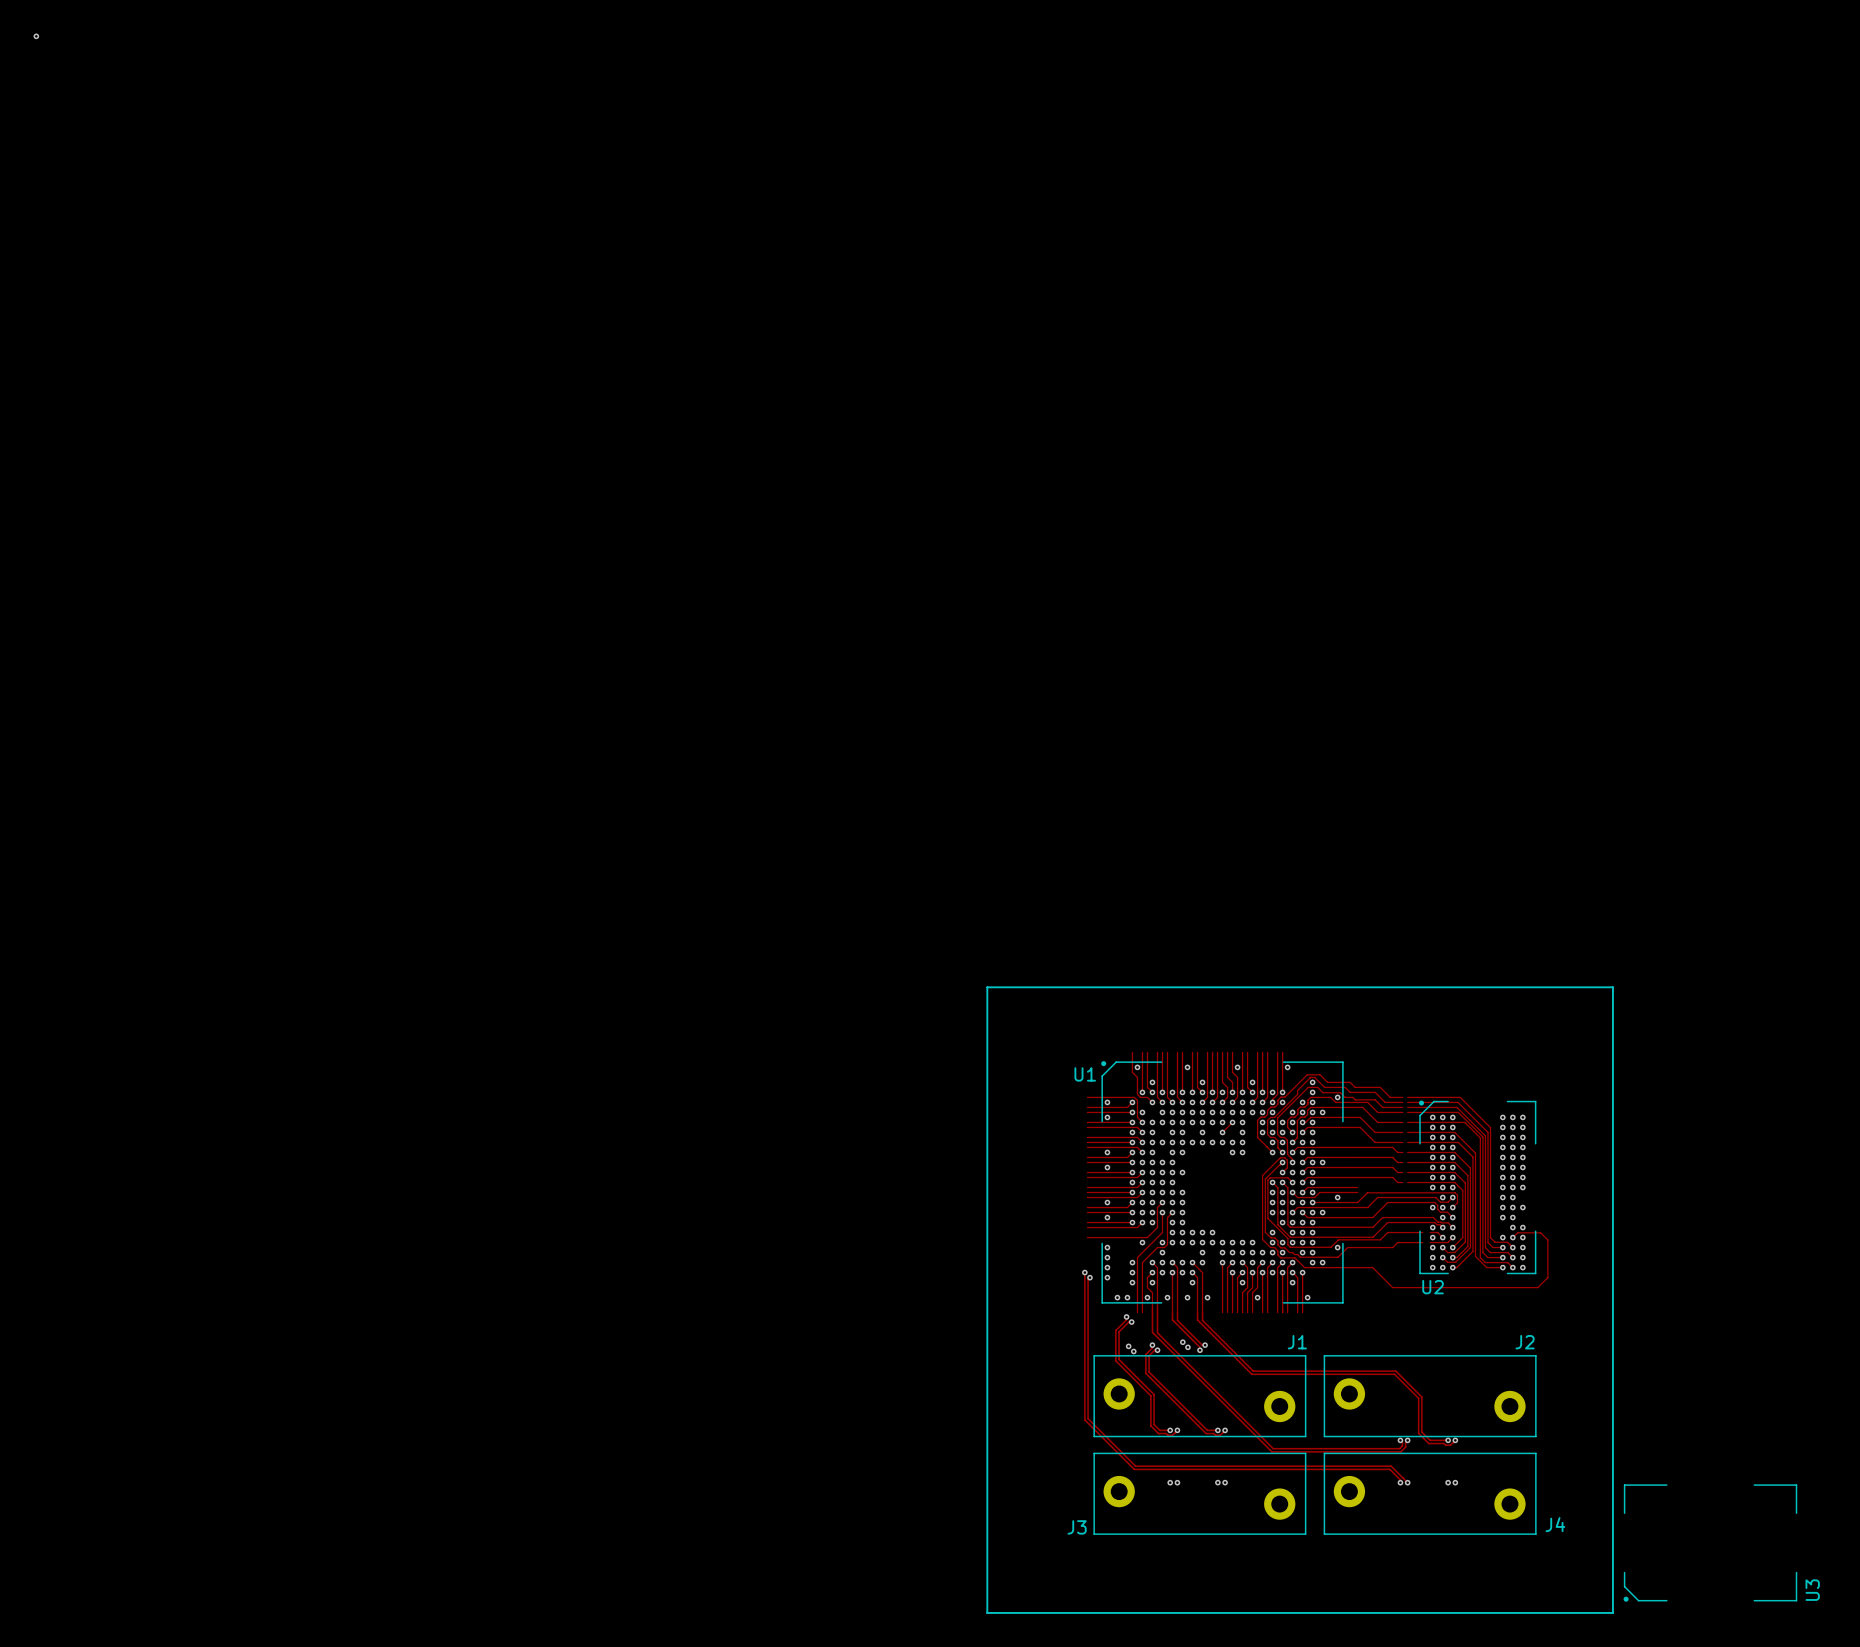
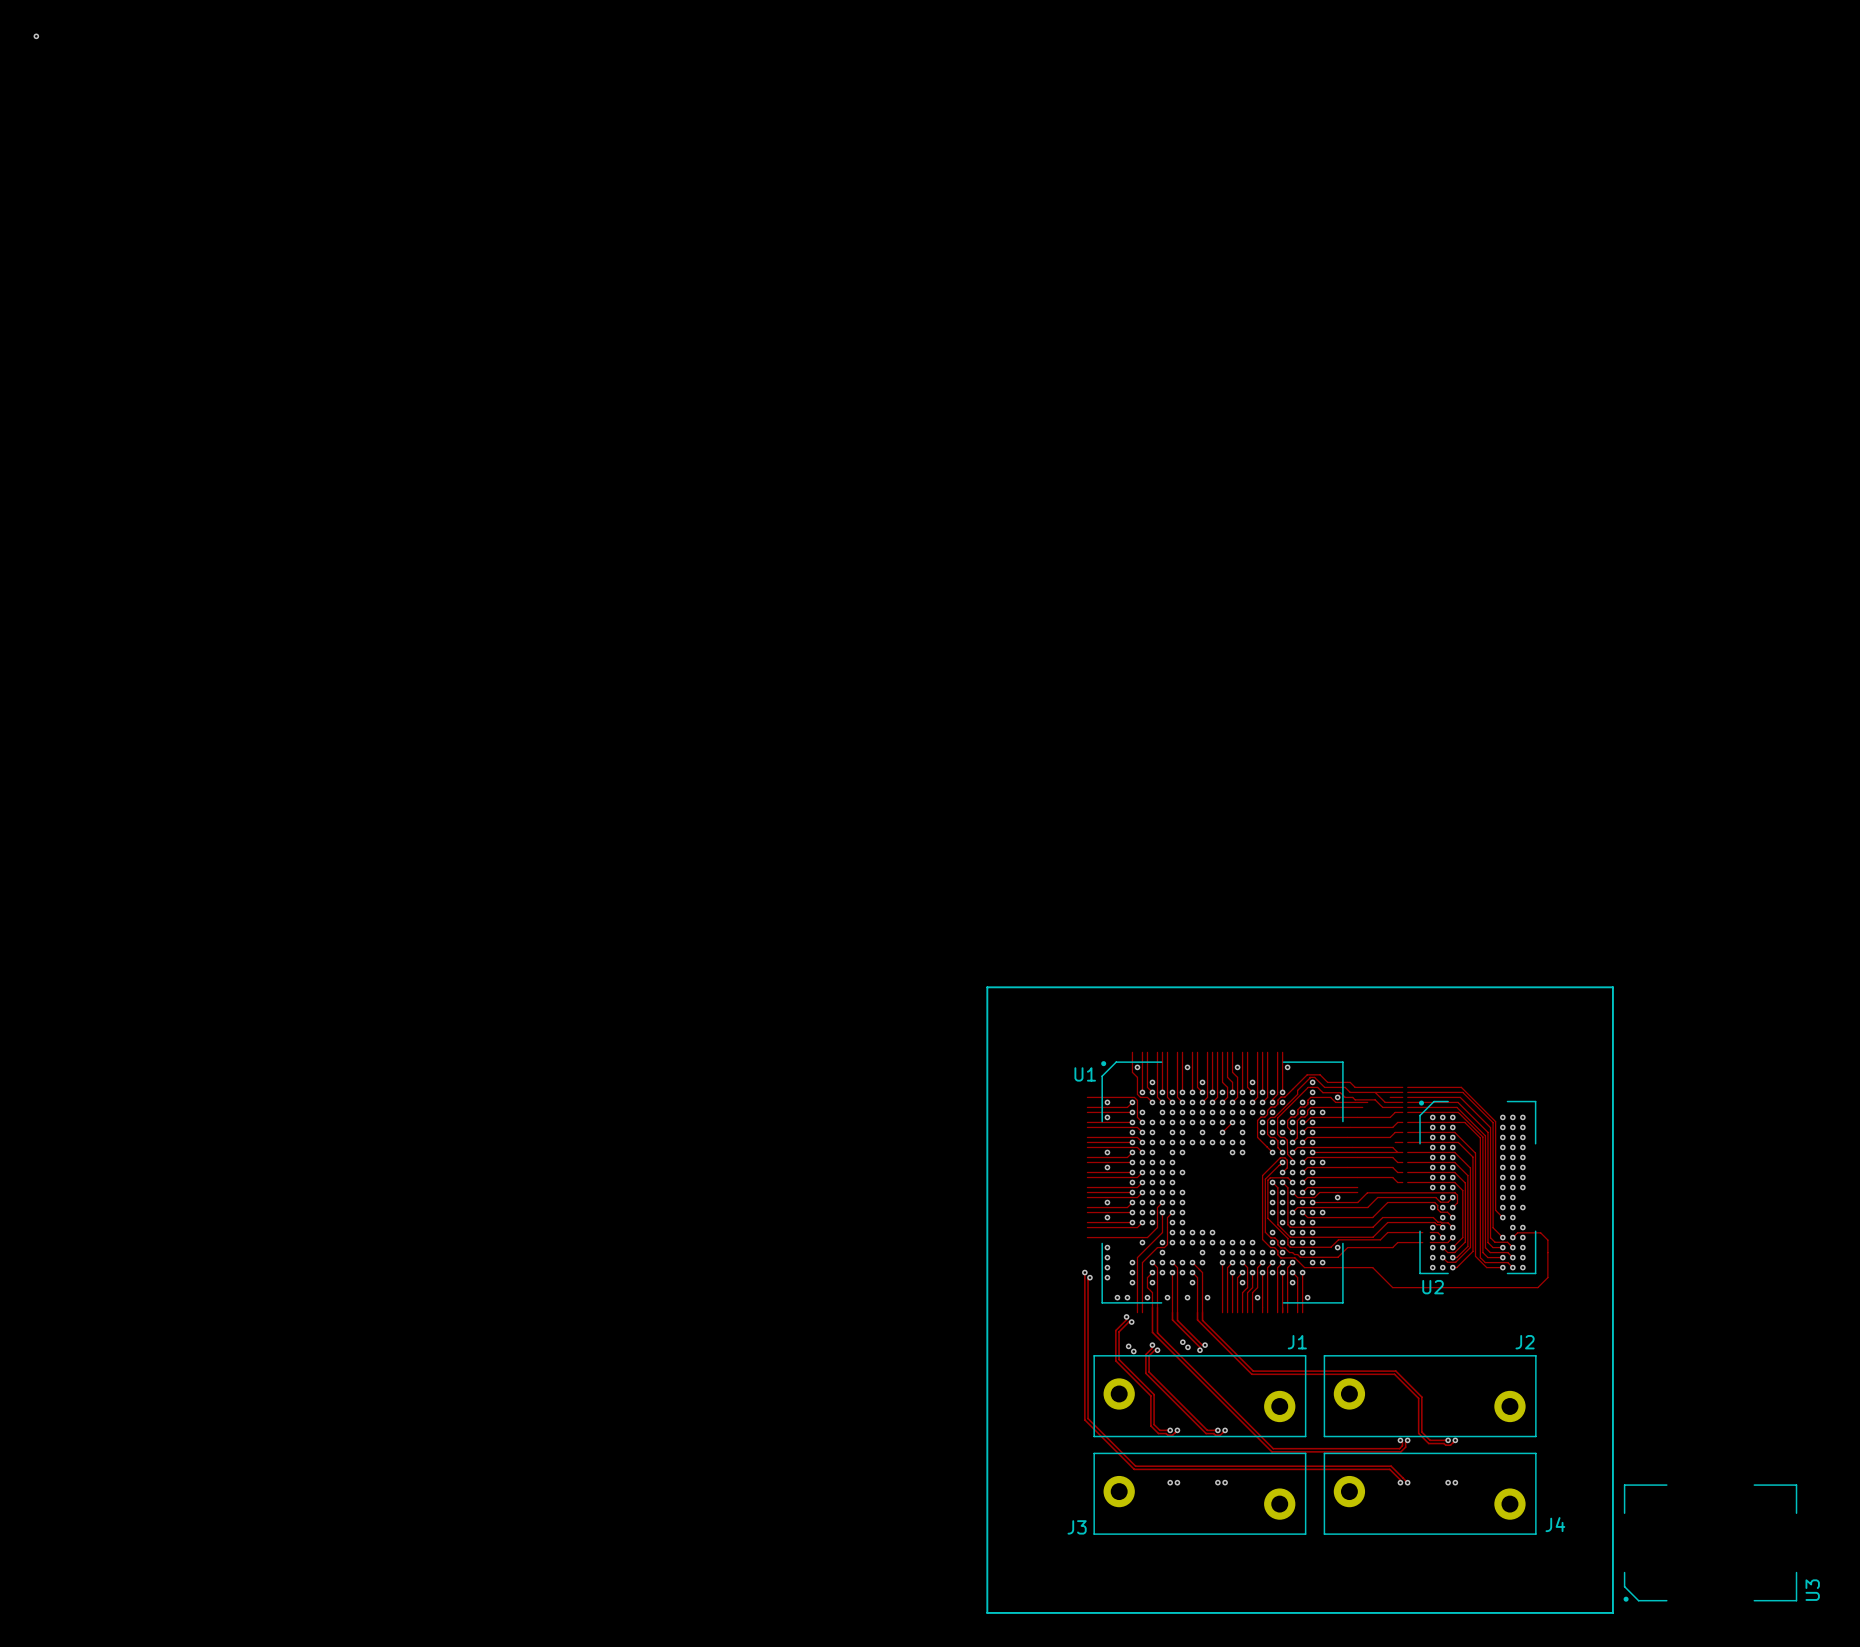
track: (1380, 1087) (1390, 1097) -> (1380, 1087) (1402, 1087)
track: none -> (1407, 1087) (1461, 1087) (1495, 1121) (1495, 1210) (1502, 1217)
track: none -> (1375, 1092) (1402, 1092)
track: none -> (1407, 1092) (1462, 1092) (1493, 1122) (1493, 1227) (1502, 1237)
track: (1367, 1102) (1377, 1112) (1395, 1112) -> (1360, 1117) (1390, 1117) (1395, 1112)
track: (1362, 1107) (1377, 1122) (1397, 1122) -> (1360, 1127) (1392, 1127) (1397, 1122)
track: (1360, 1117) (1375, 1132) (1395, 1132) -> (1302, 1142) (1307, 1137) (1390, 1137) (1395, 1132)
track: (1360, 1127) (1375, 1142) (1395, 1142) -> none
track: none -> (1312, 1152) (1397, 1152)

